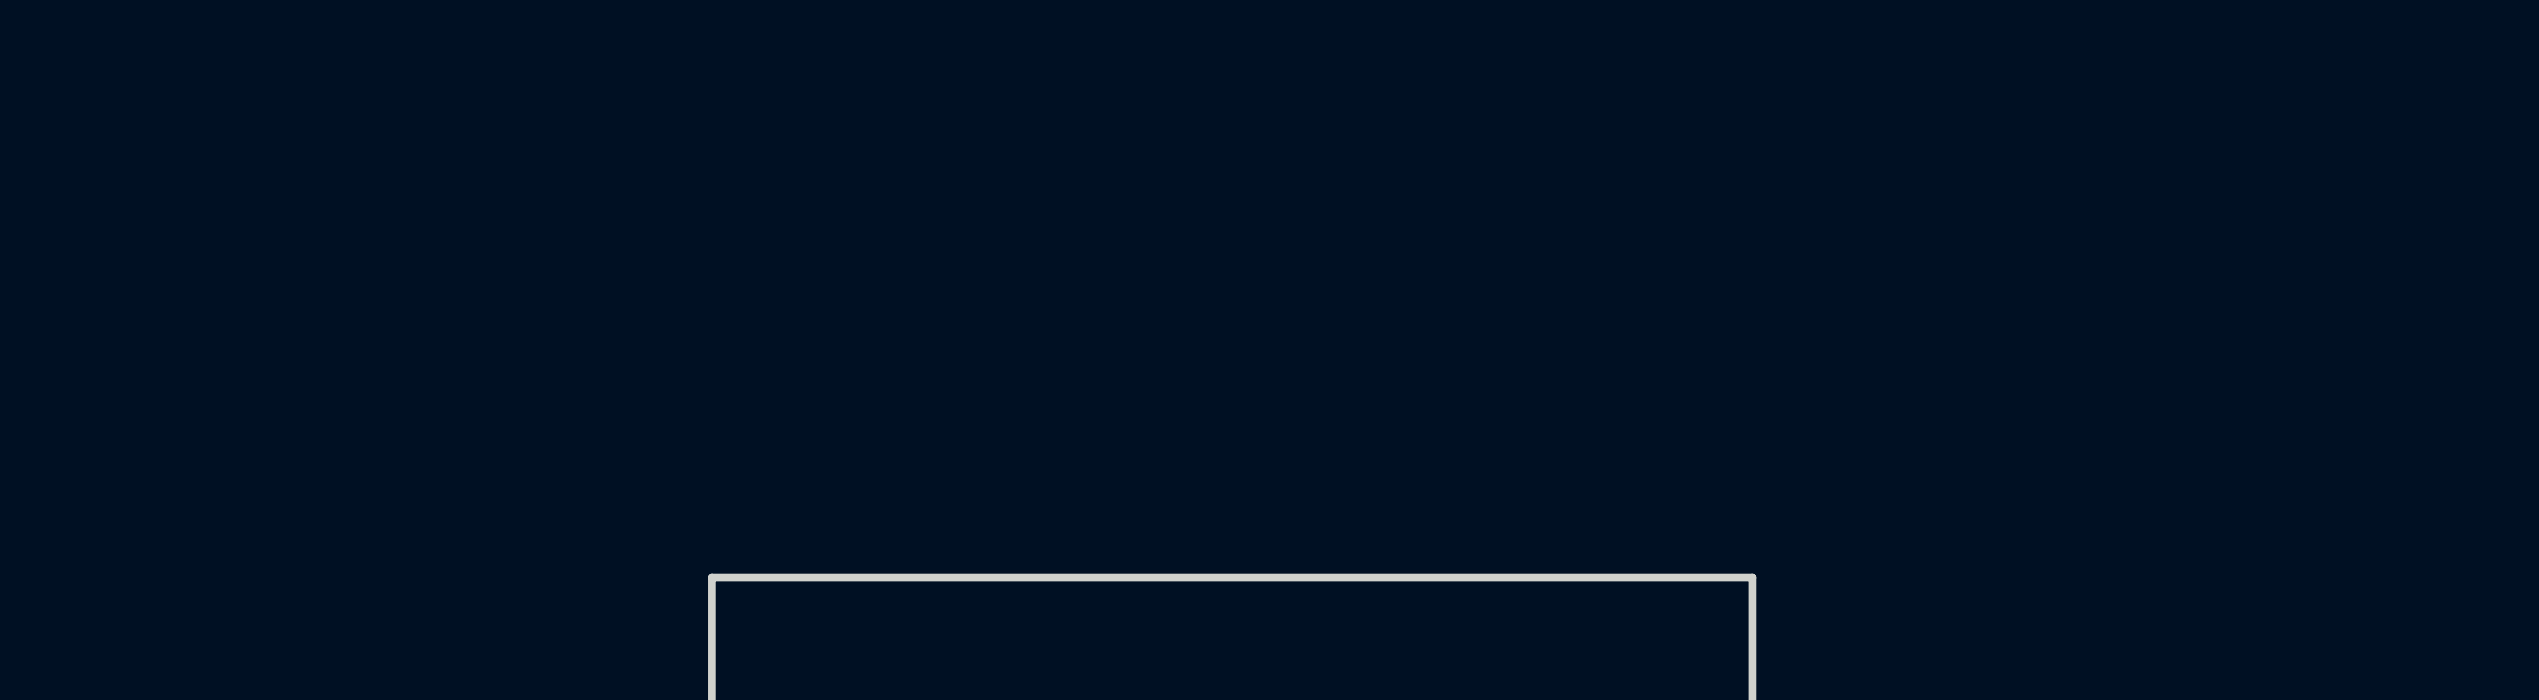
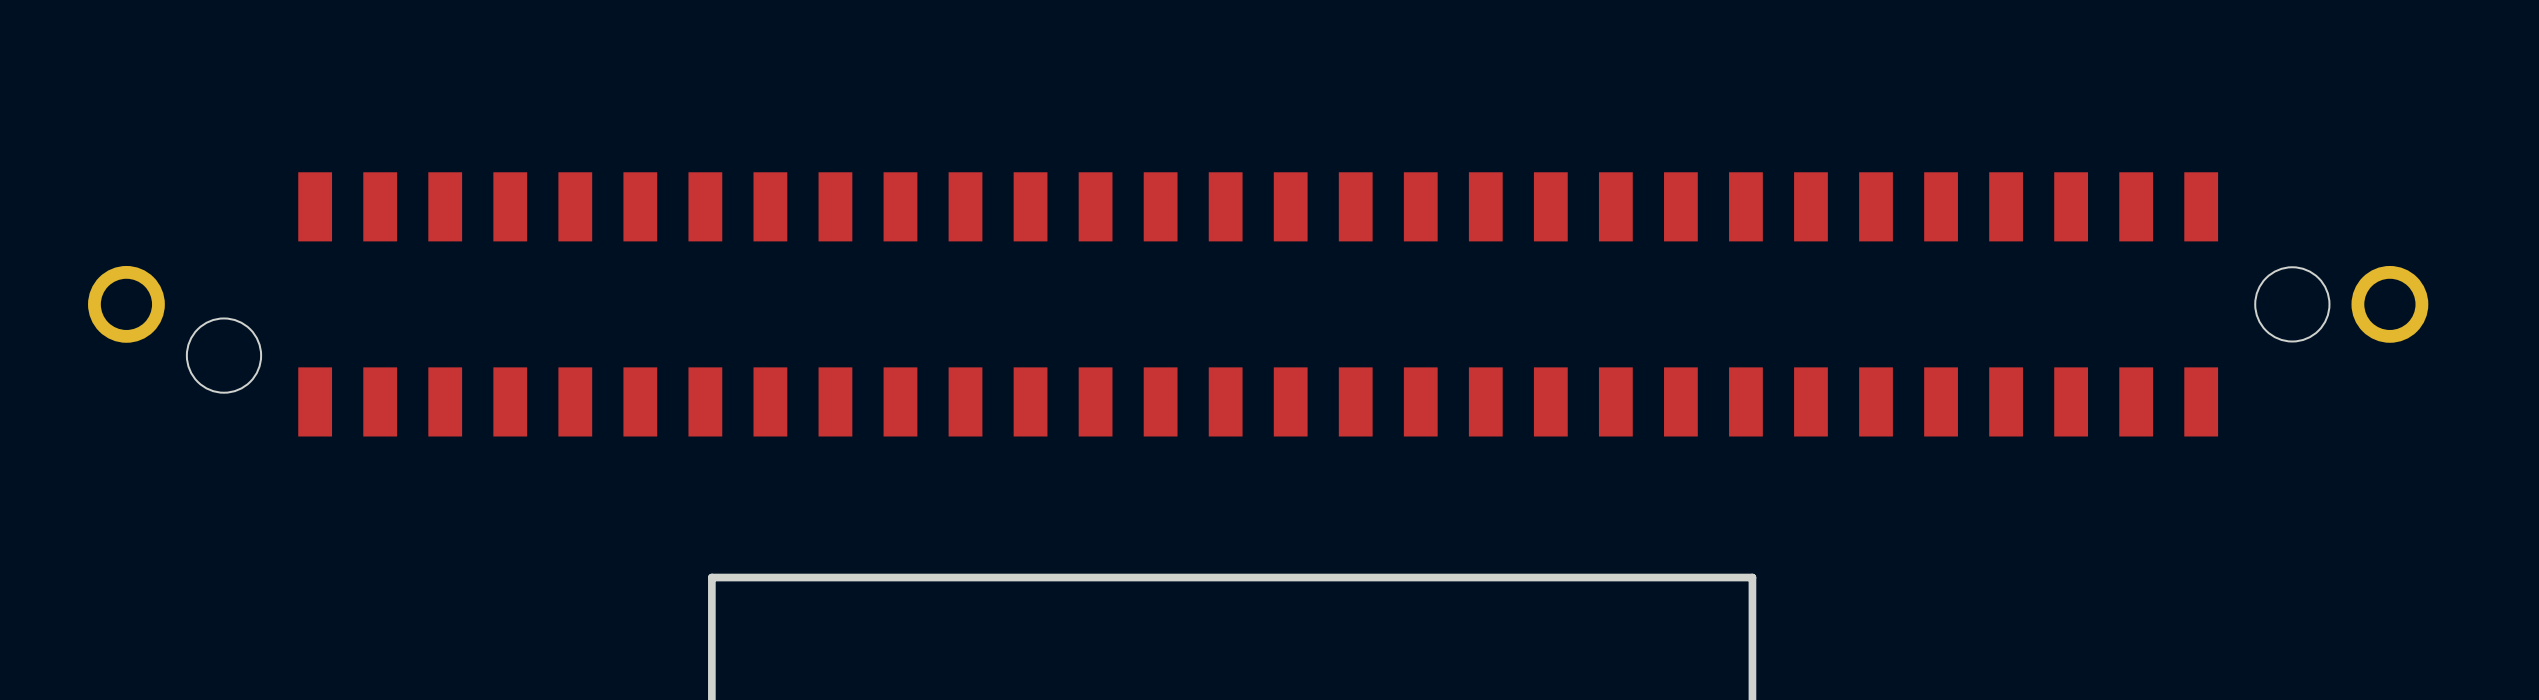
part: none -> (1258, 304)

